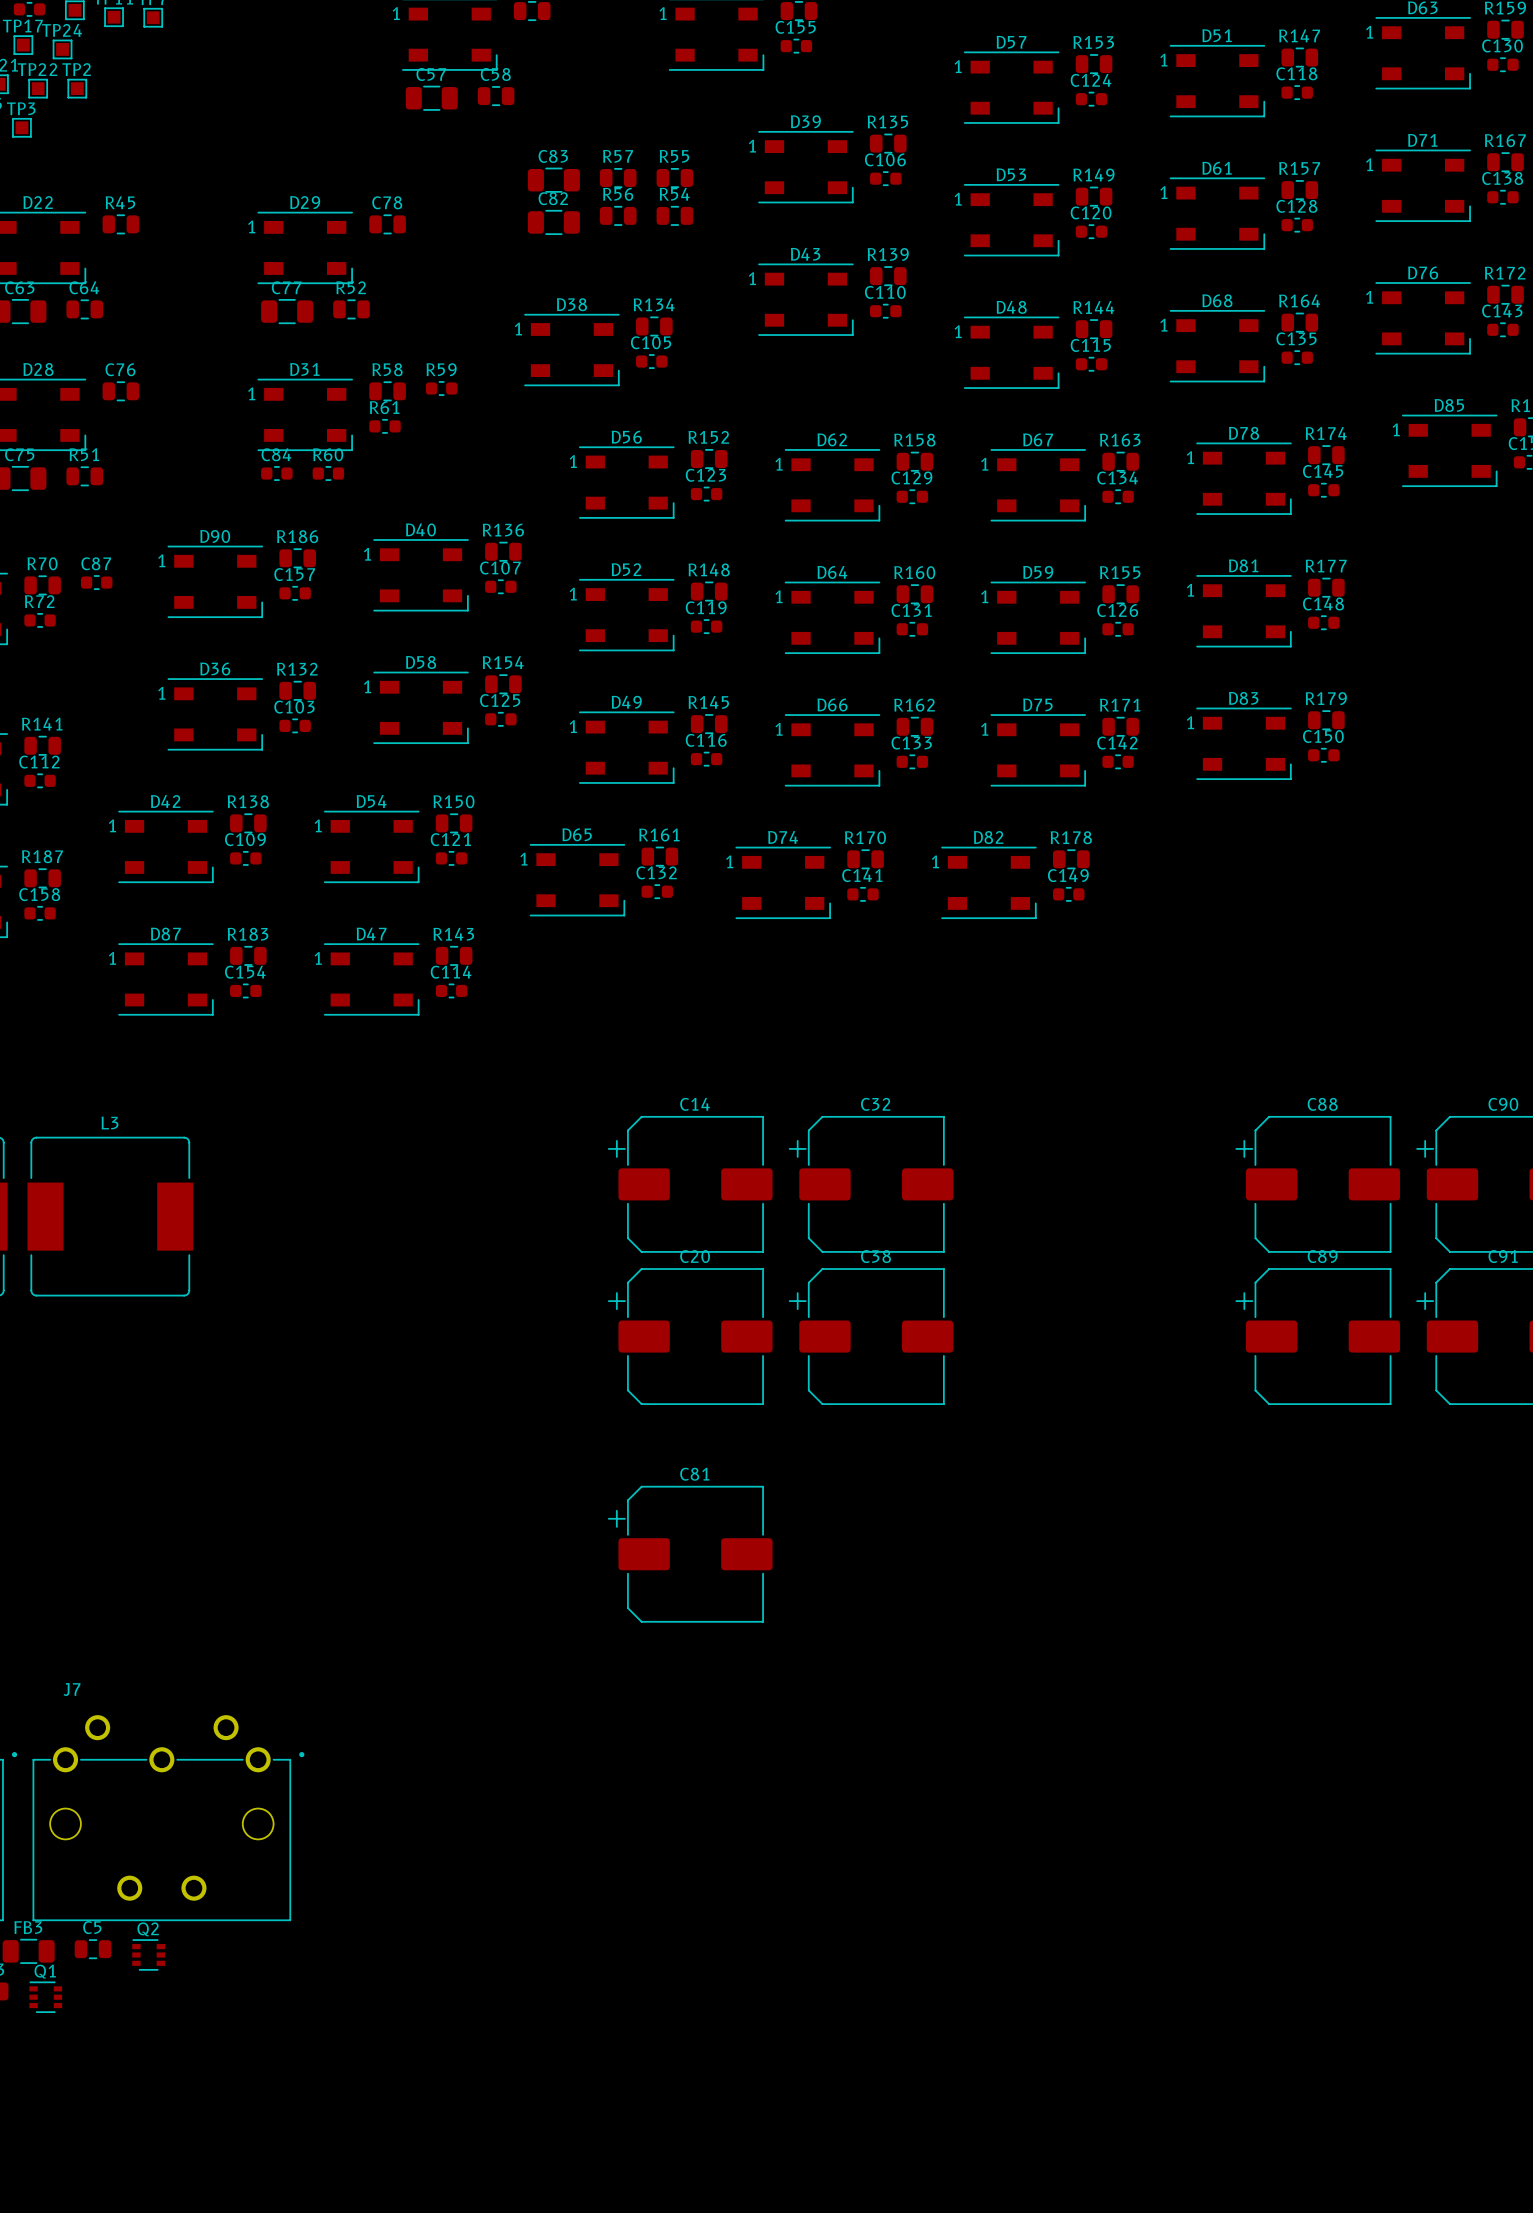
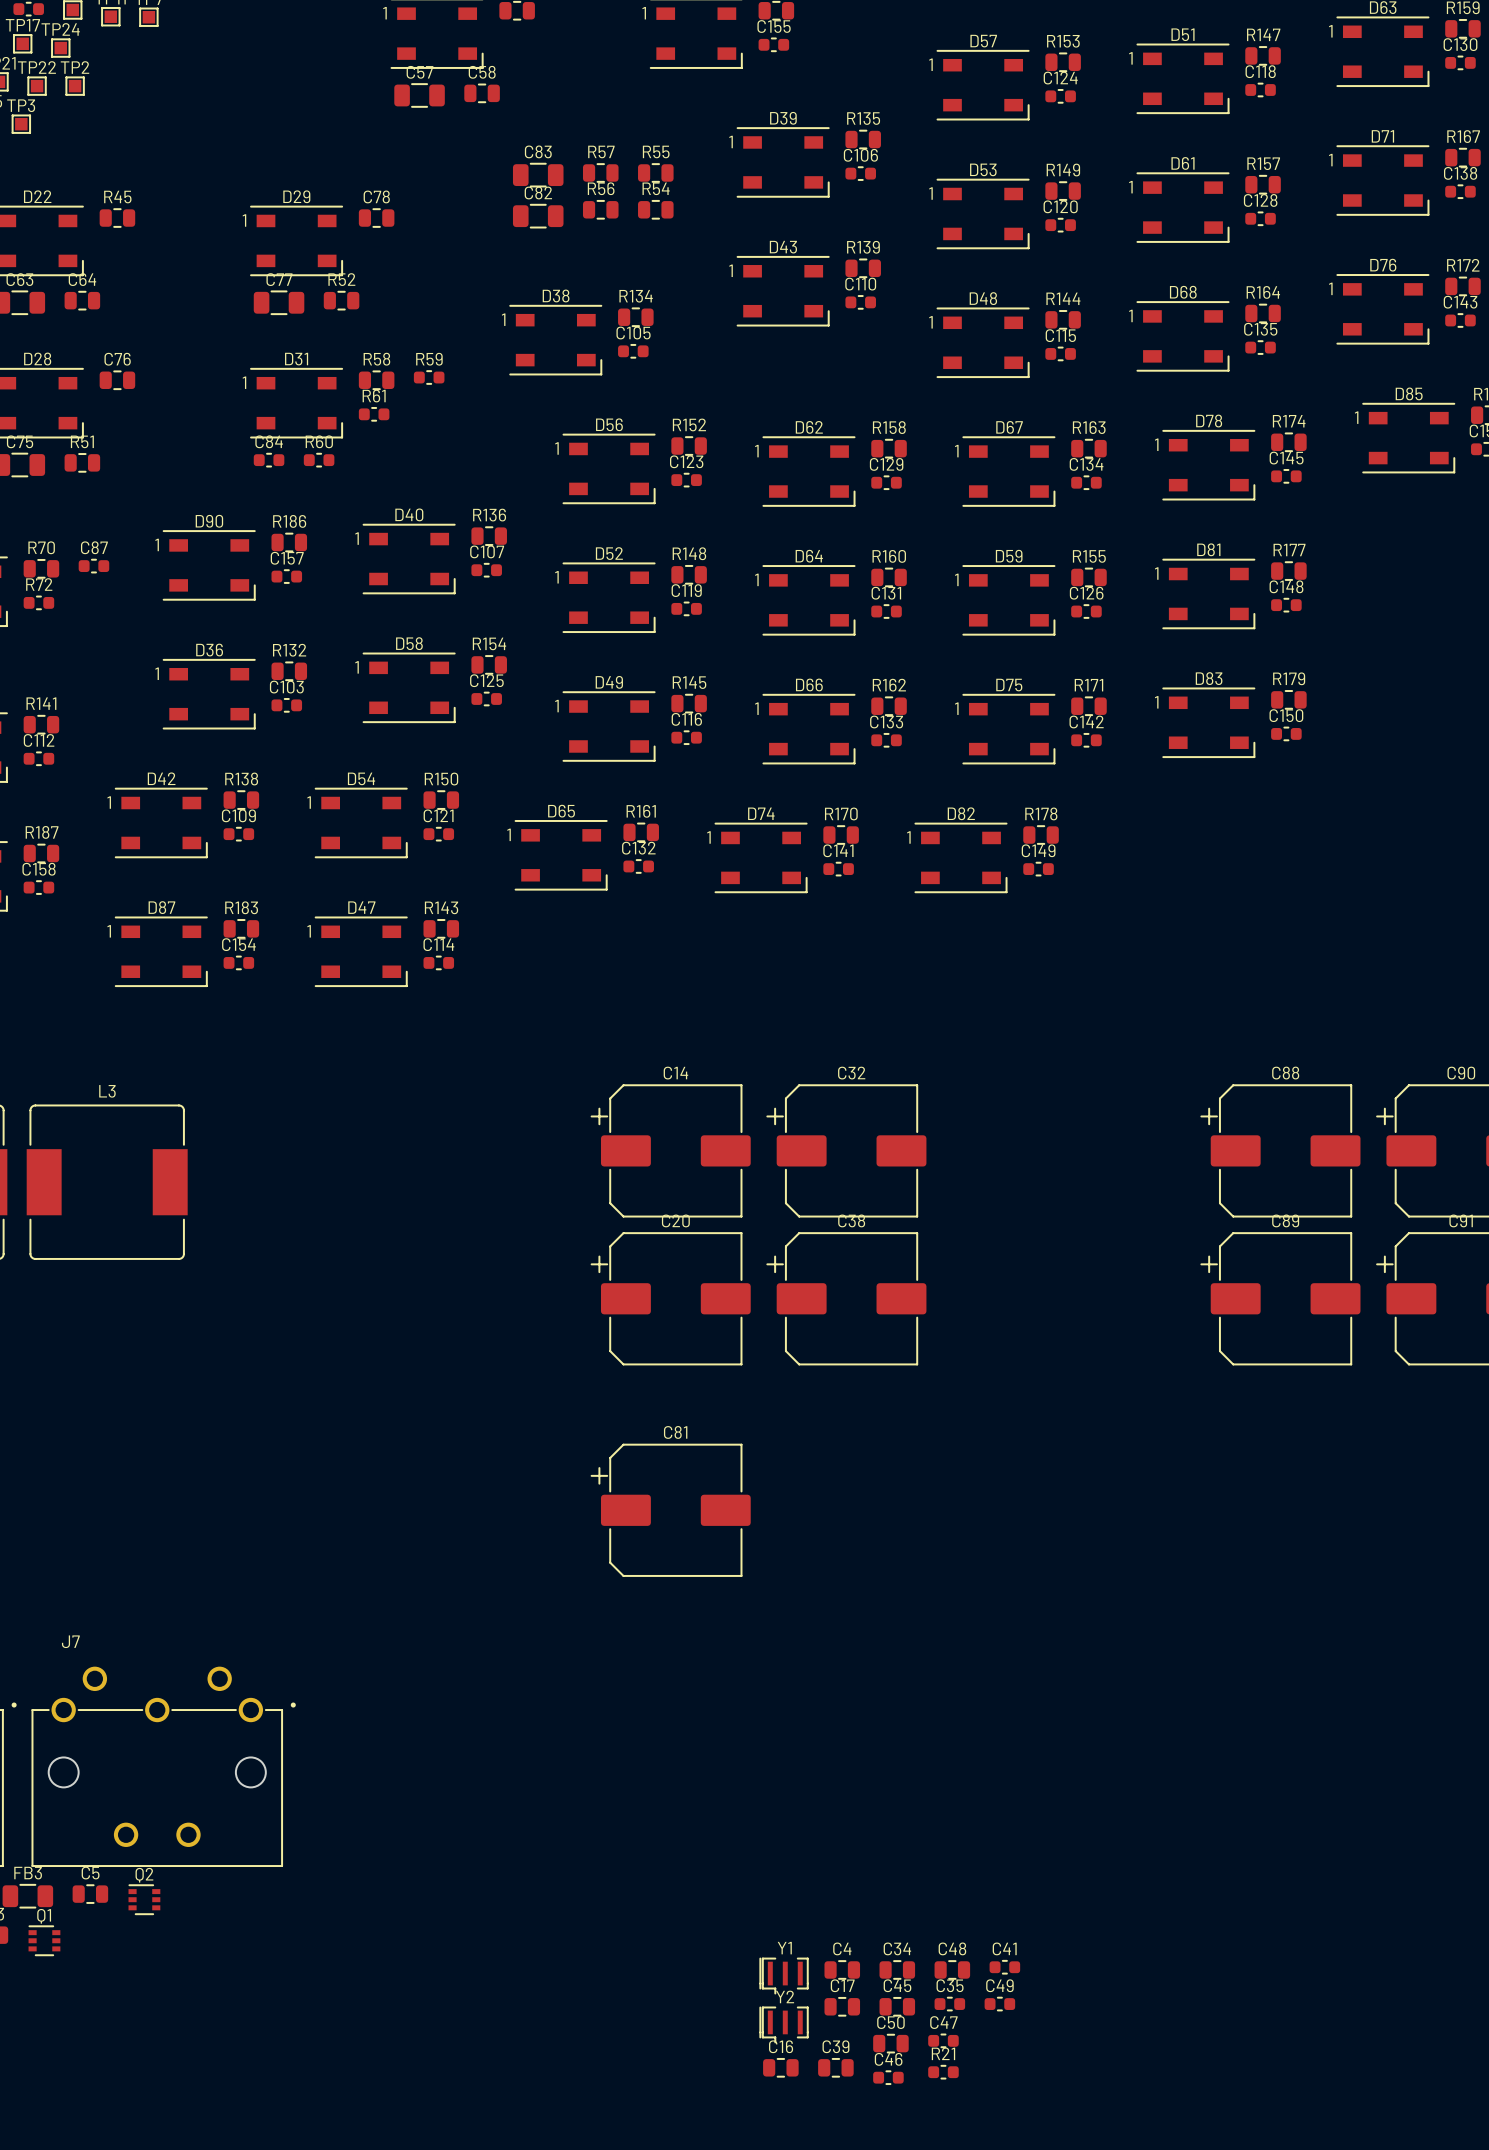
C41: none -> (1004, 1967)
C4: none -> (842, 1969)
C34: none -> (897, 1969)
C48: none -> (952, 1969)
Y1: none -> (784, 1976)
C35: none -> (949, 2004)
C49: none -> (999, 2004)
C17: none -> (842, 2006)
C45: none -> (897, 2006)
Y2: none -> (784, 2024)
C47: none -> (943, 2040)
C50: none -> (890, 2043)
C16: none -> (780, 2067)
C39: none -> (835, 2067)
R21: none -> (943, 2072)
C46: none -> (888, 2077)

